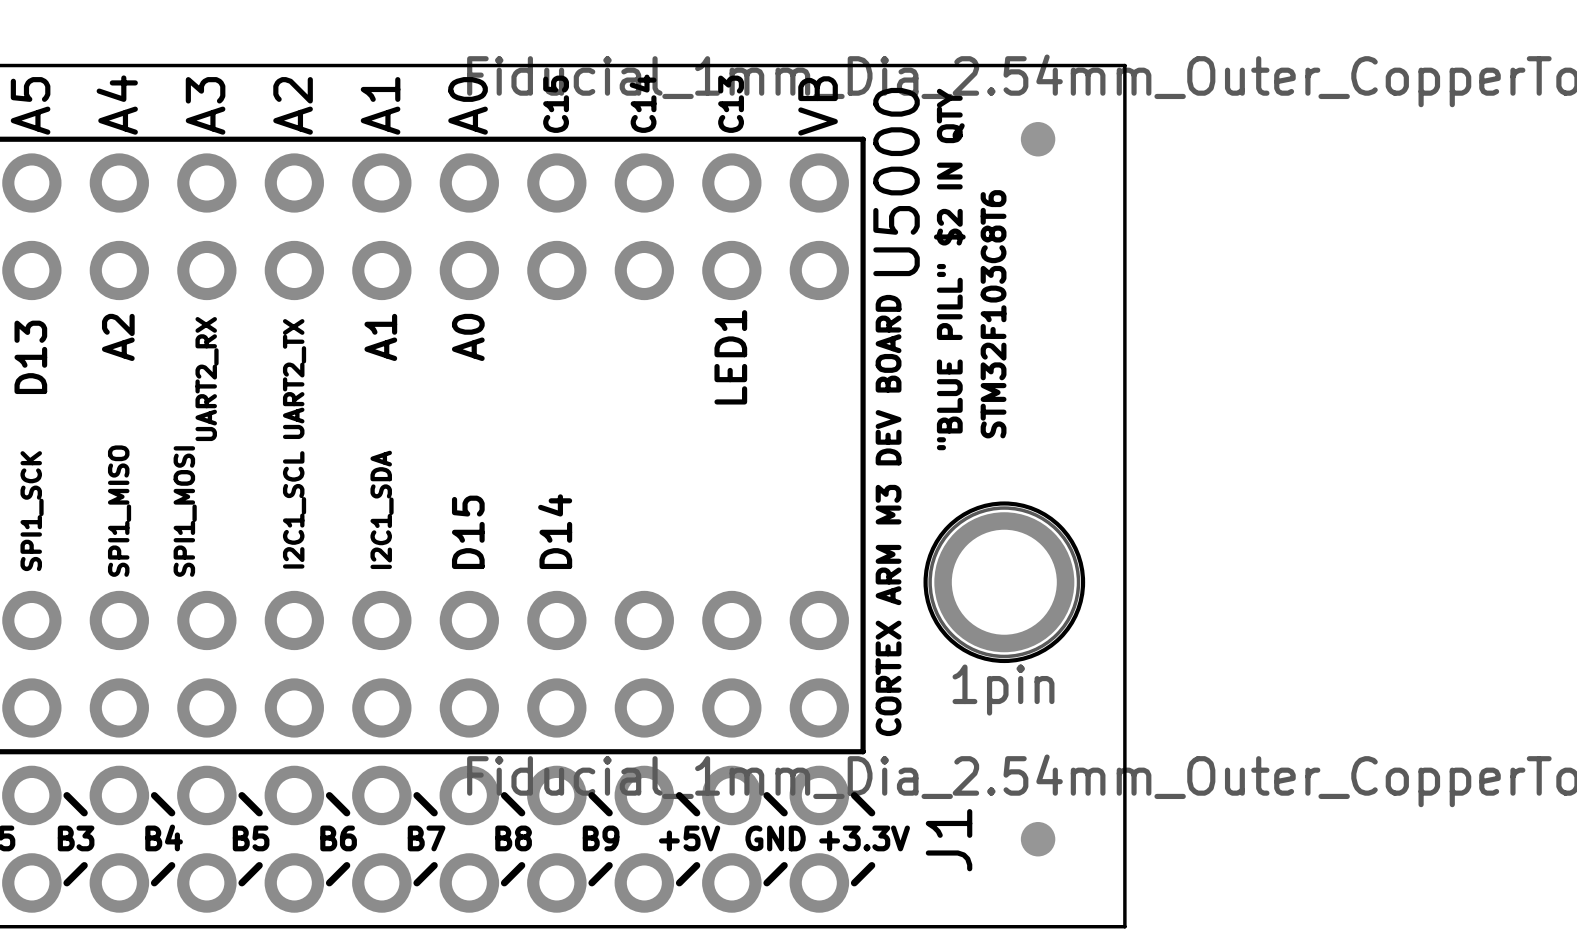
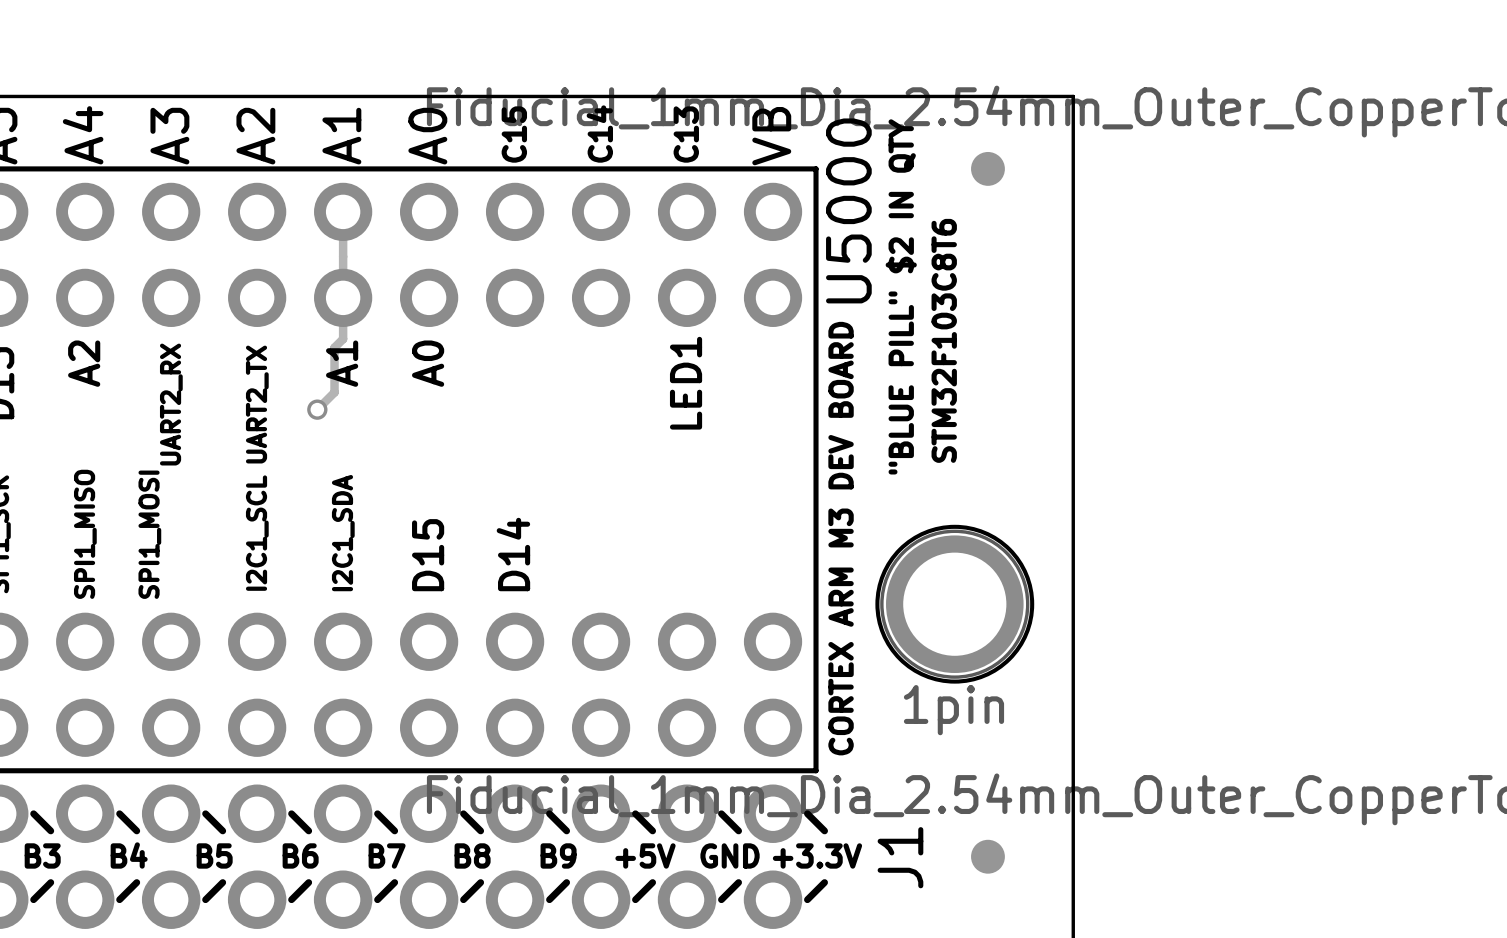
track: none -> (343, 211) (343, 339) (334, 347) (334, 392) (317, 409)
via: none -> (317, 409)

